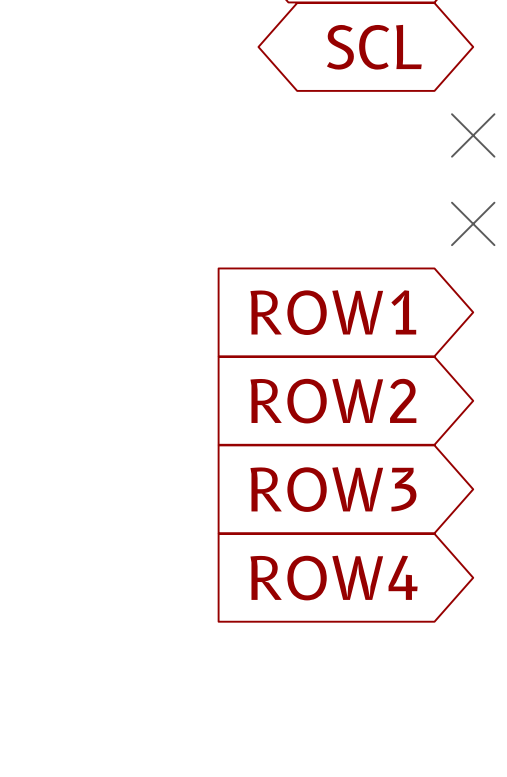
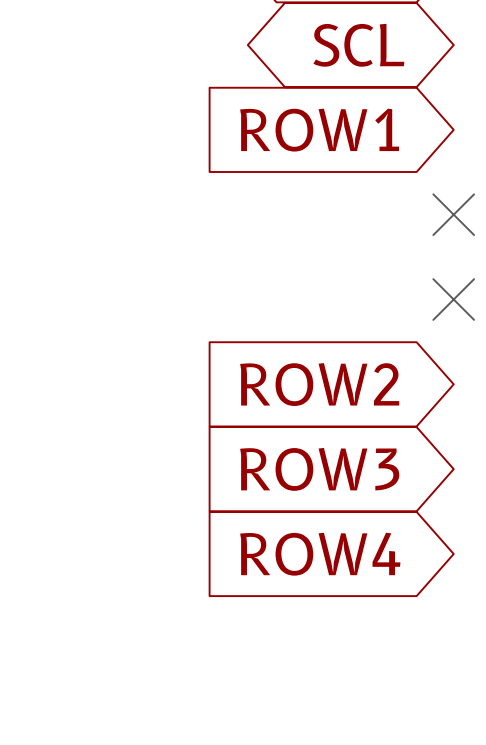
no-connect mark position: (473, 135) -> (453, 299)
global label position: ROW1 (333, 312) -> ROW1 (319, 130)

